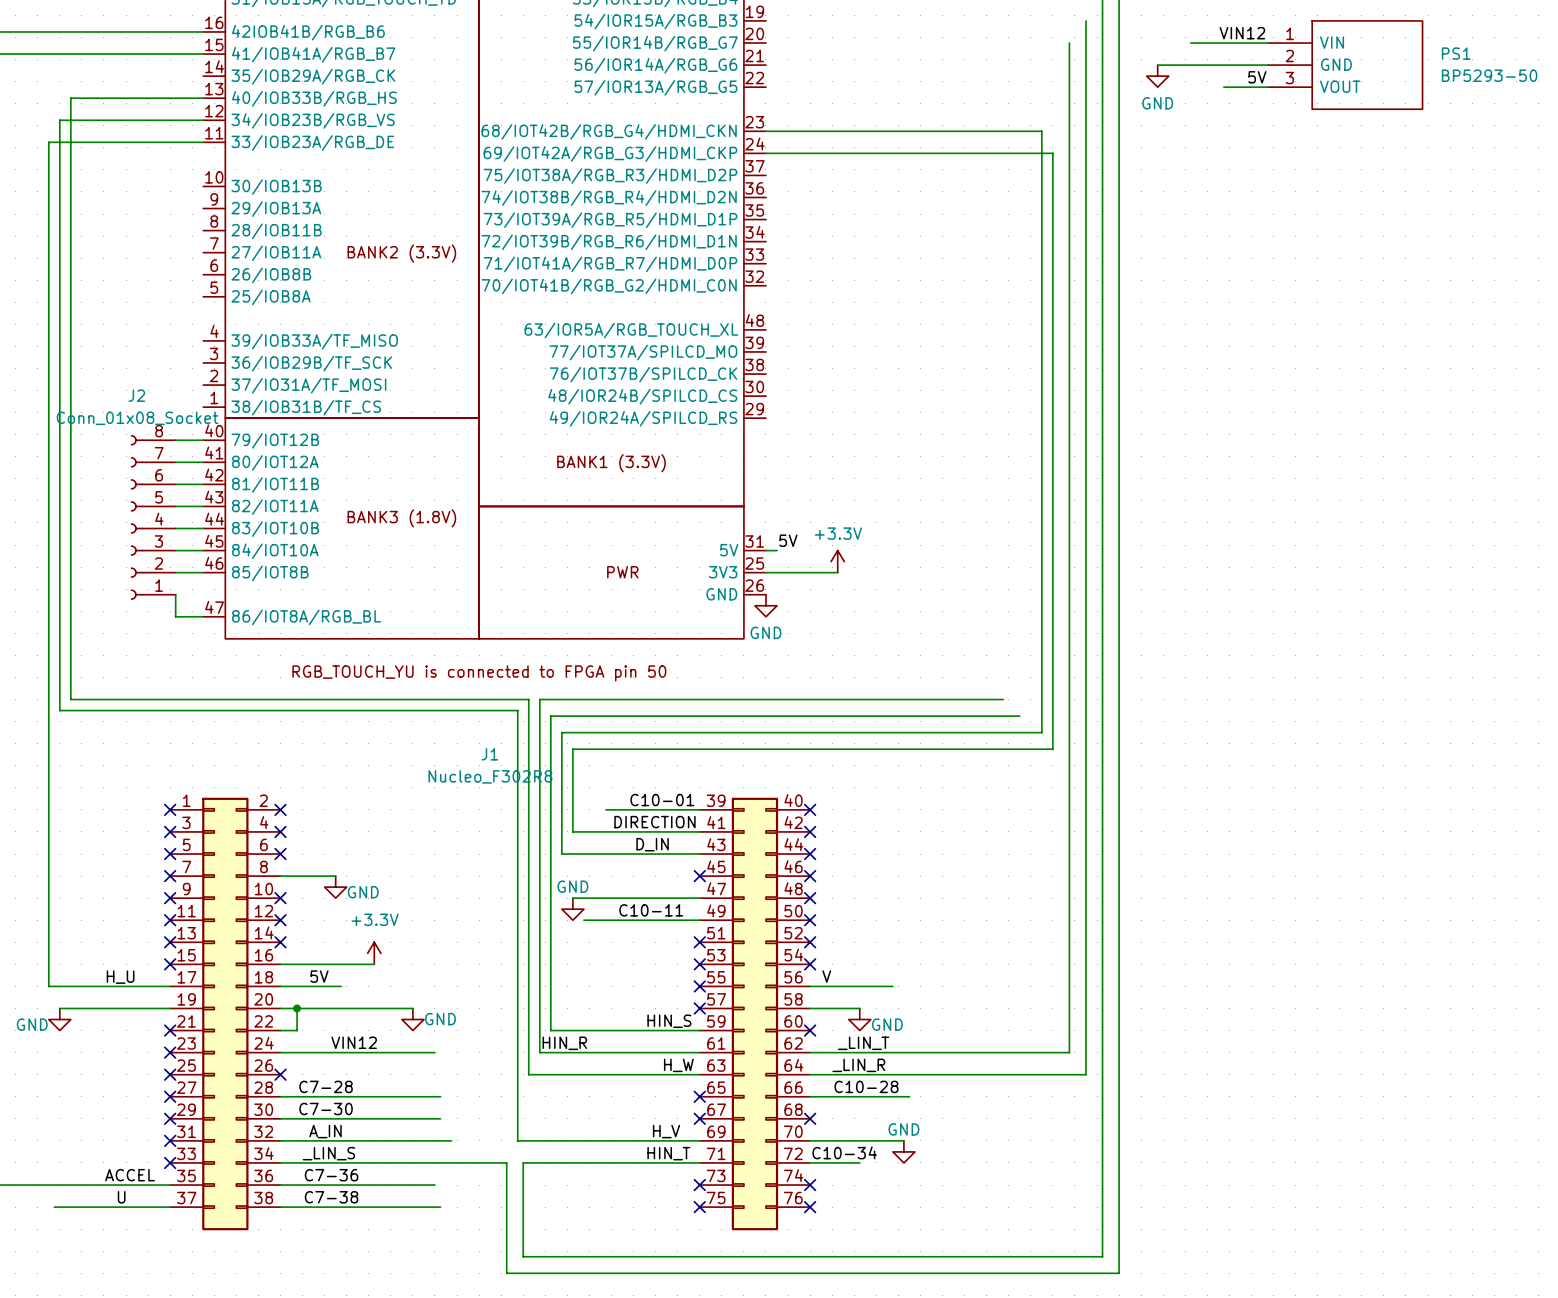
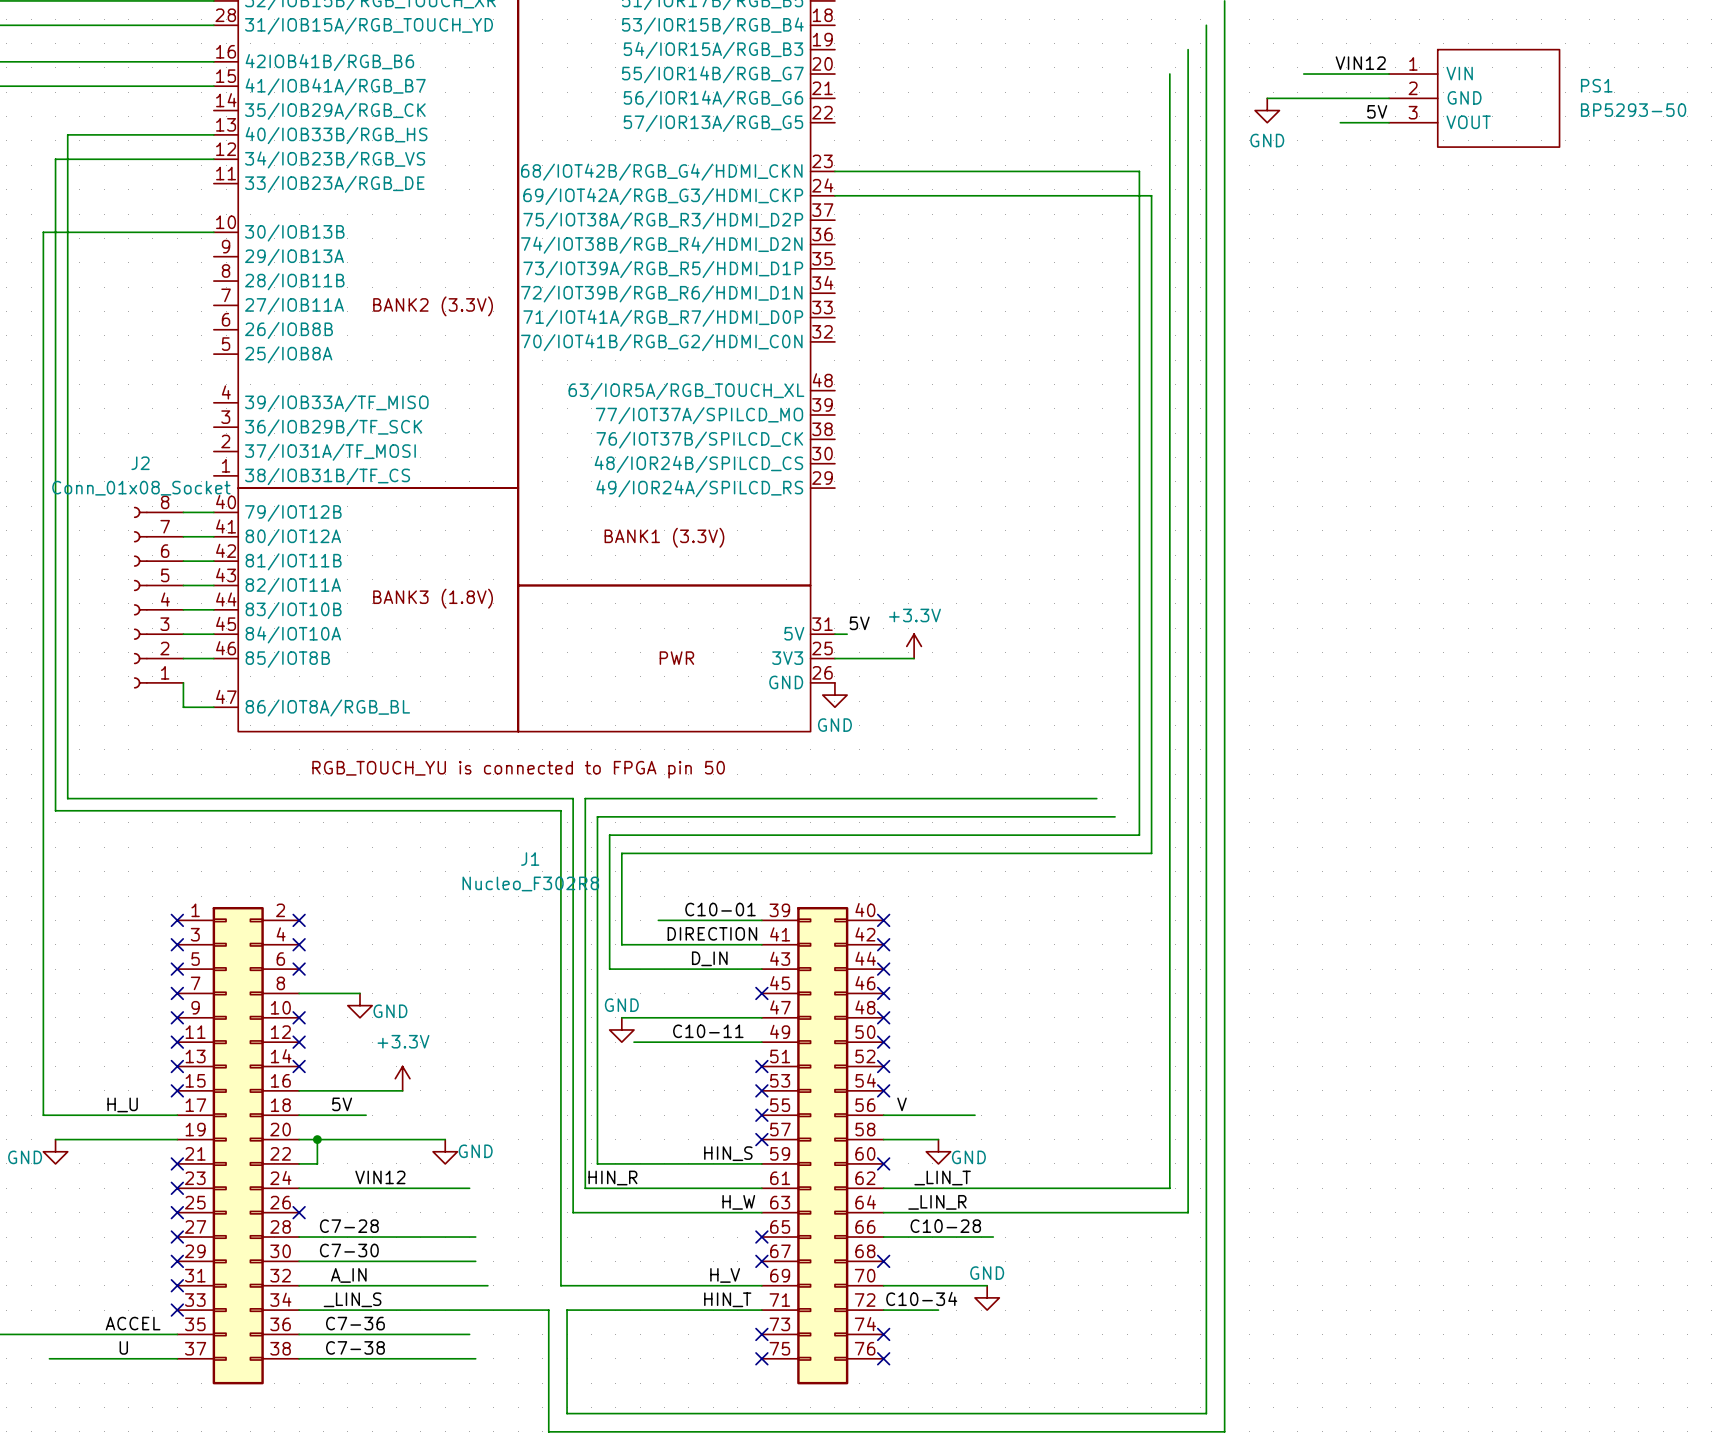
wire: (203, 142) (48, 142) (48, 186) -> (213, 232) (43, 232)

